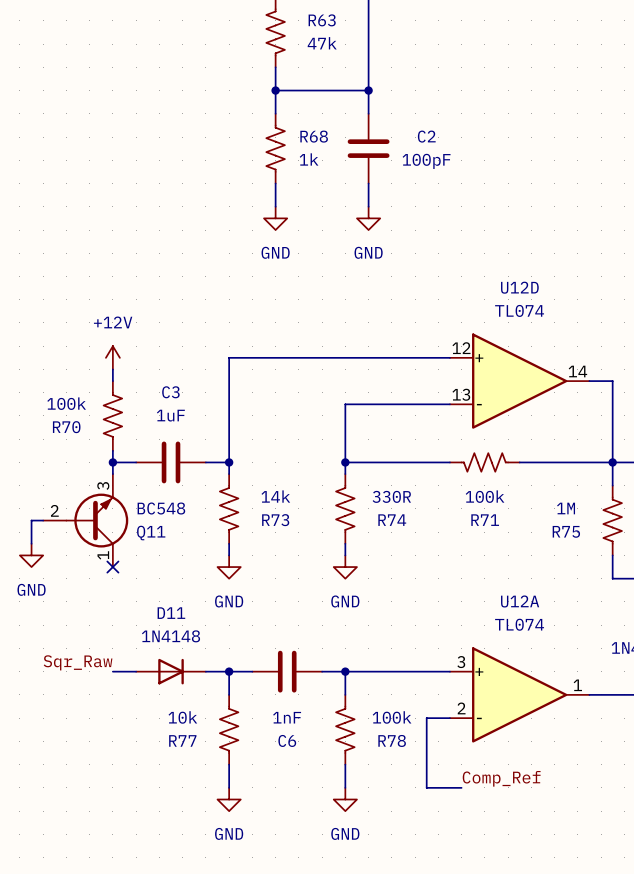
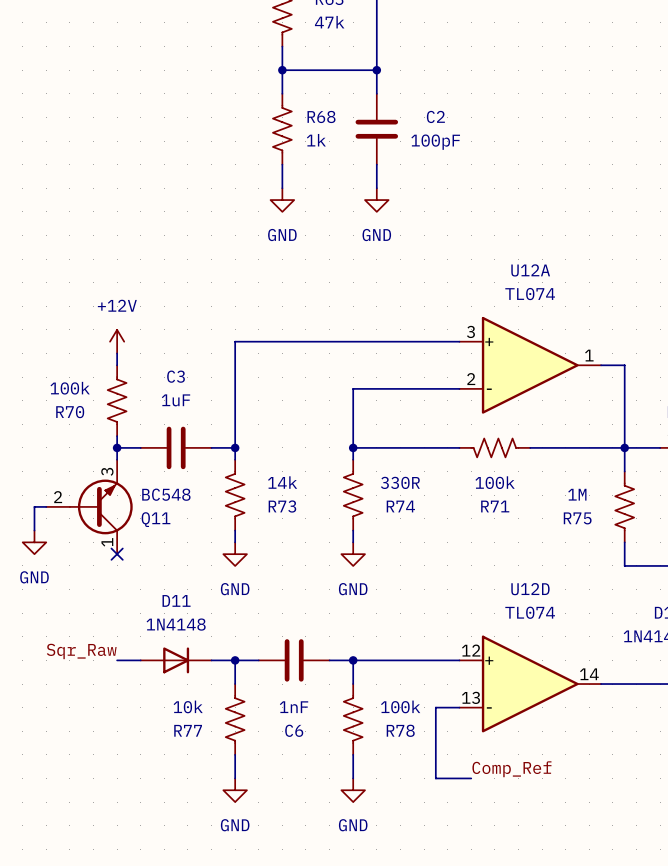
U12D position: (519, 381) -> (530, 684)
U12A position: (519, 694) -> (530, 365)

